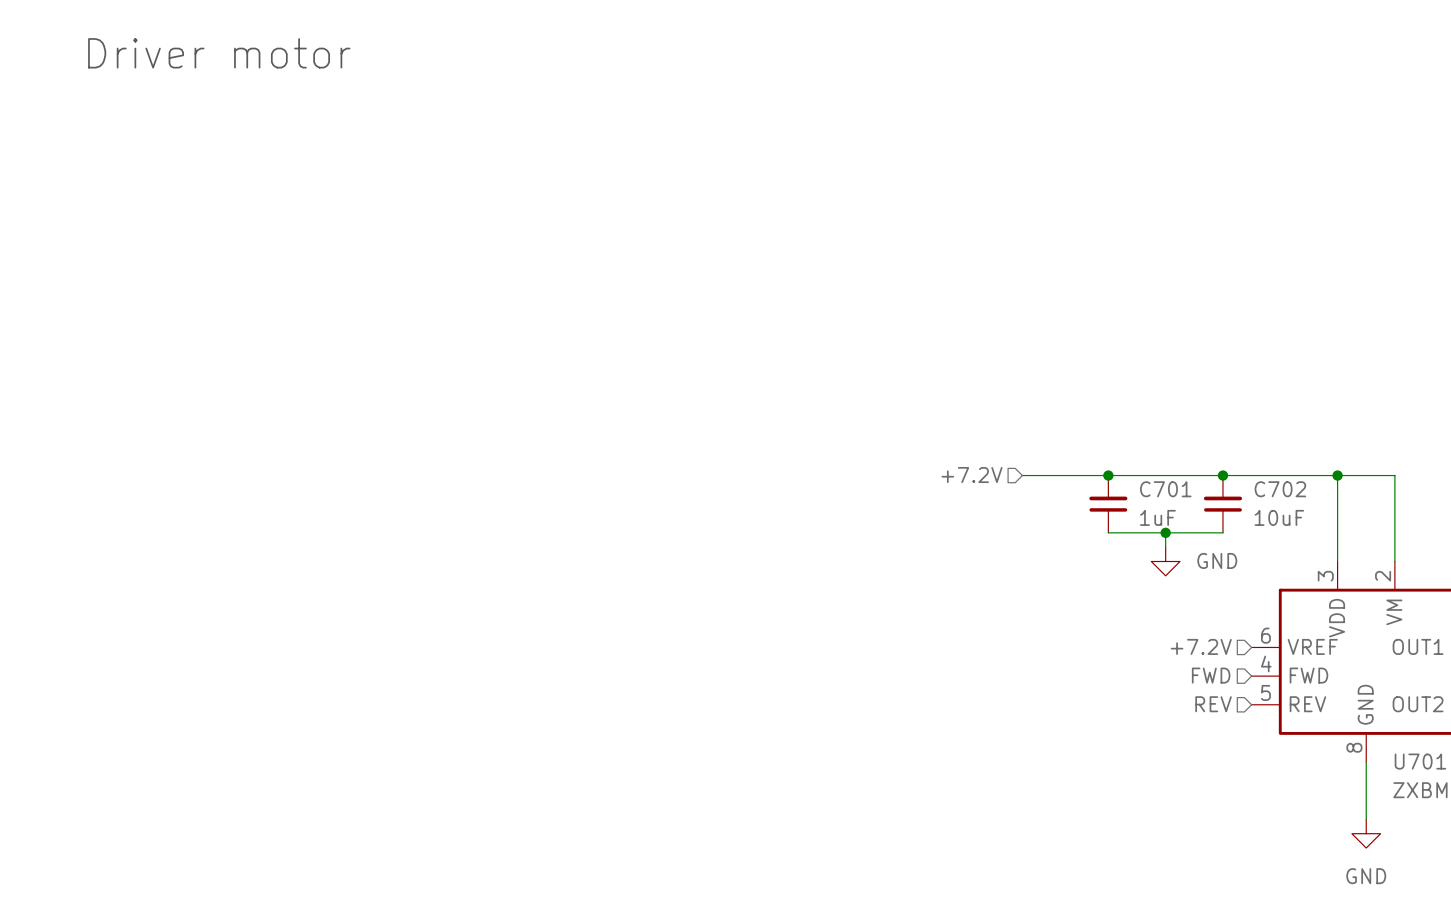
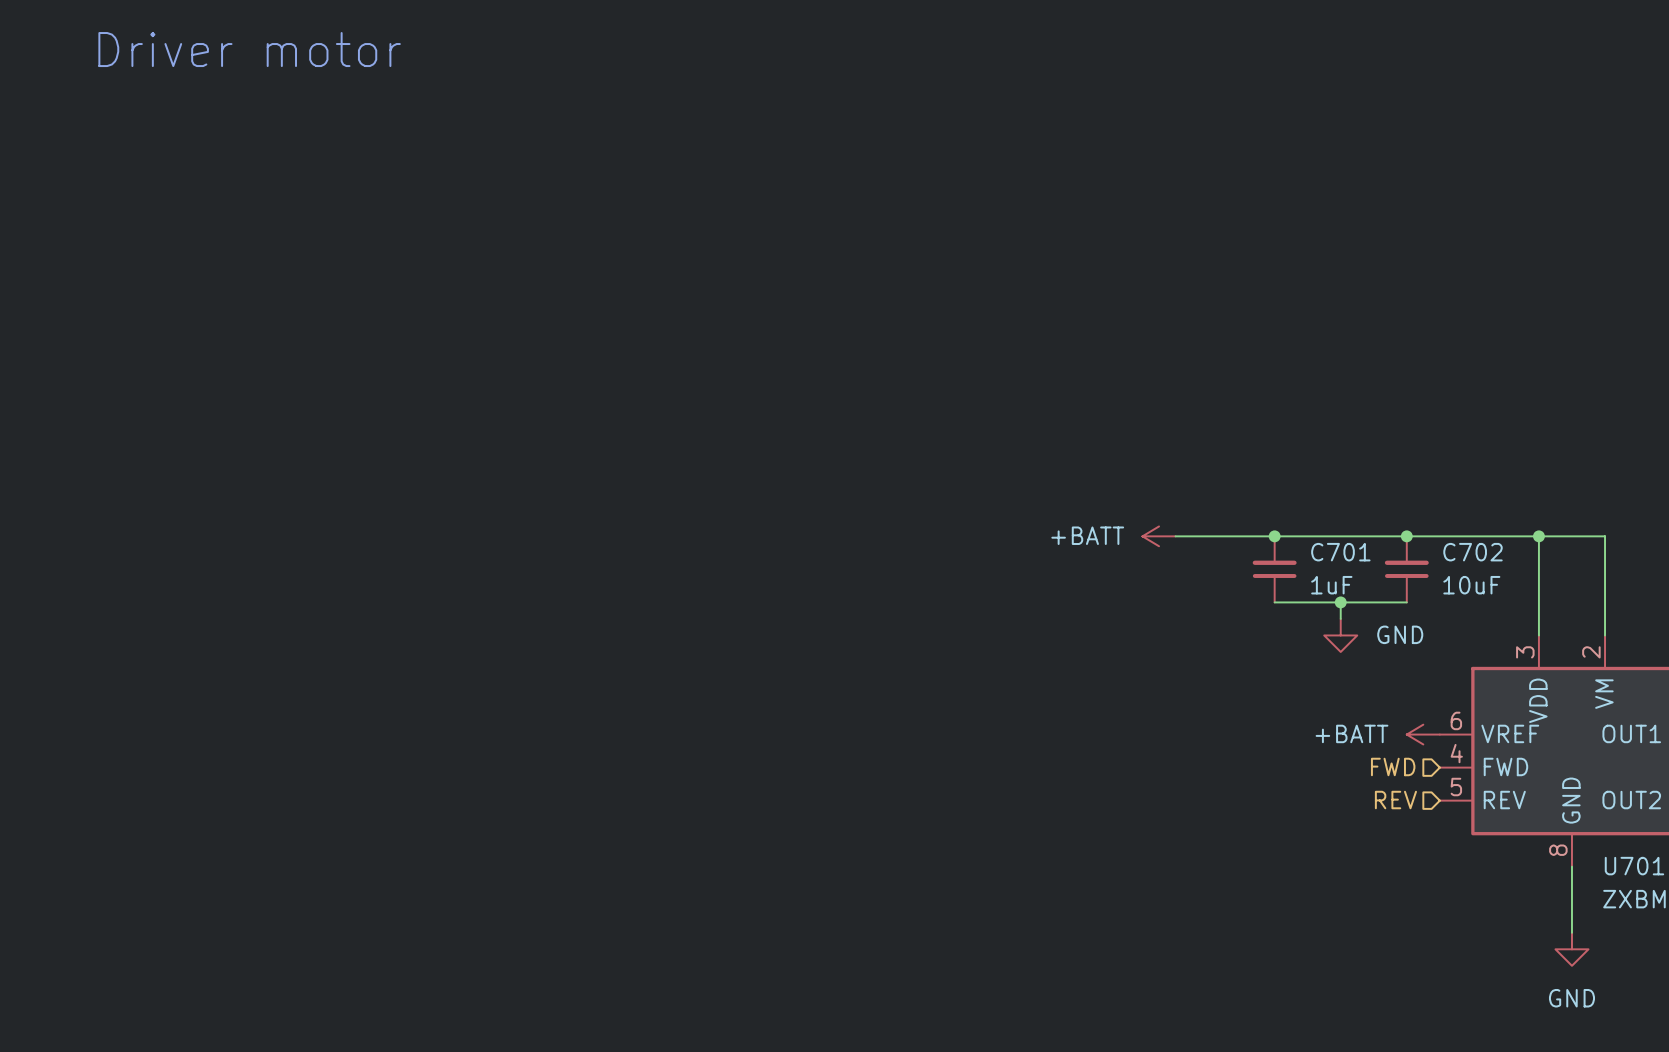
hierarchical label: +7.2V (972, 475) -> none
power symbol: none -> +BATT (1159, 536)
hierarchical label: +7.2V (1201, 646) -> none
power symbol: none -> +BATT (1423, 734)

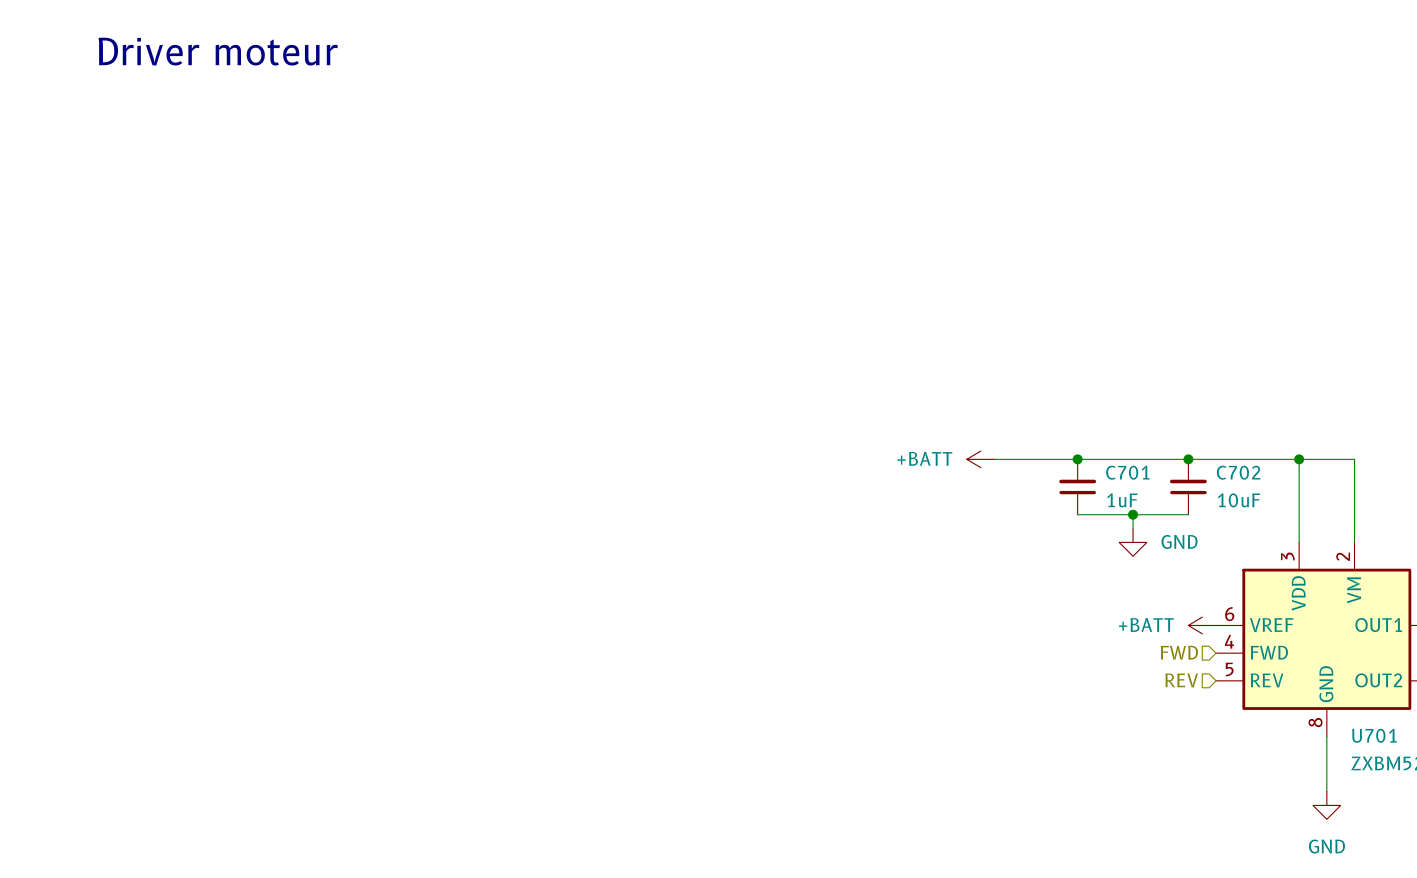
text: Driver motor (249, 49) -> Driver moteur (218, 51)

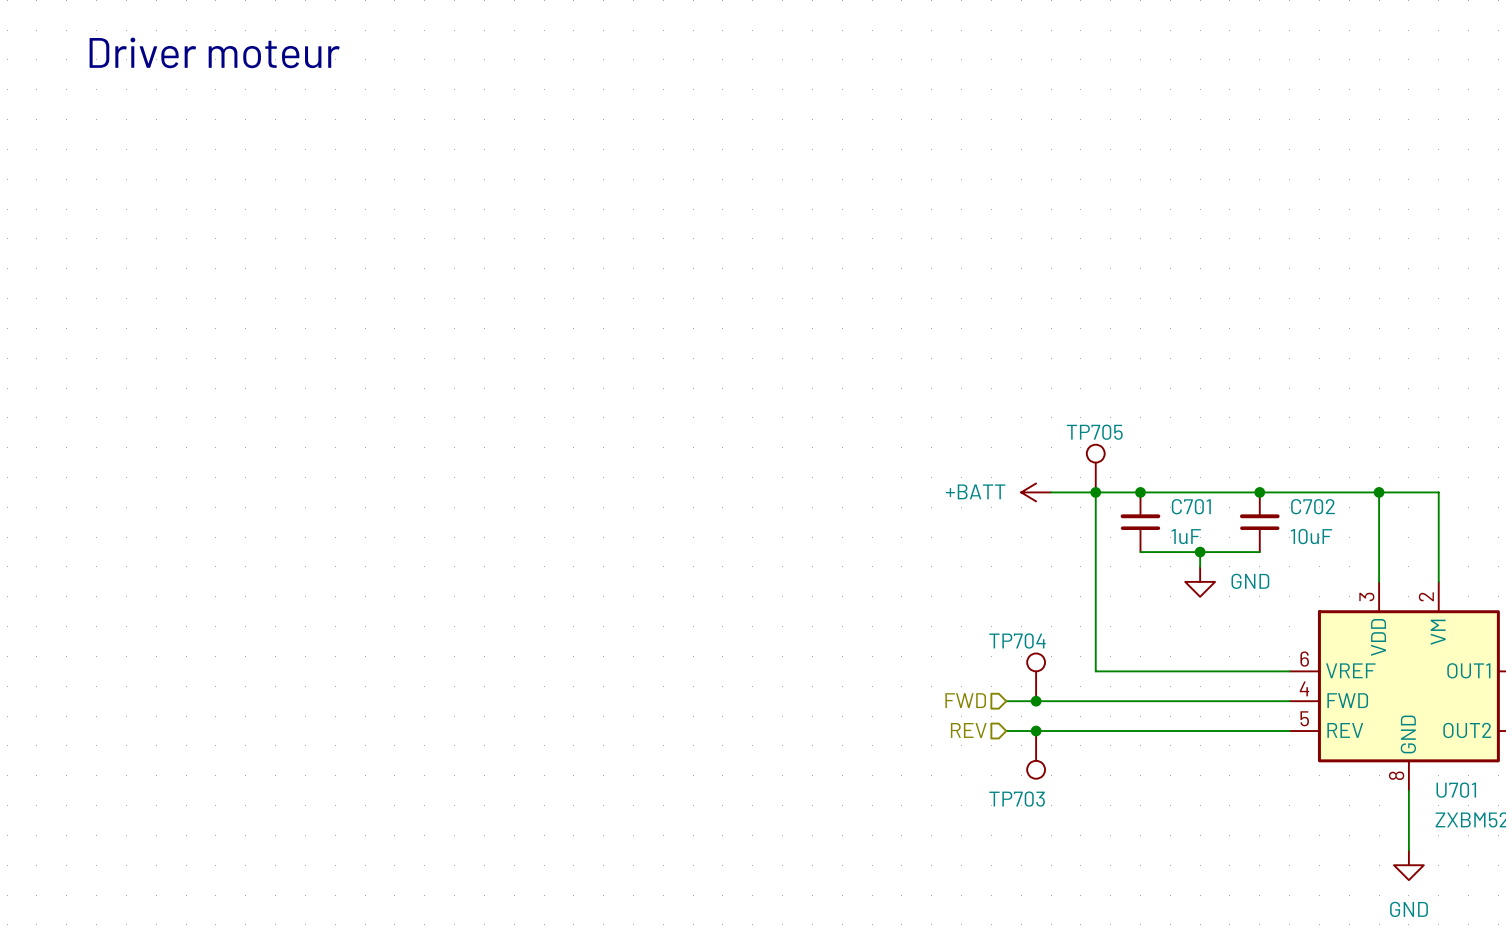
TP705: none -> (1095, 468)
wire: none -> (1095, 492) (1095, 671) (1289, 671)
junction: none -> (1095, 492)
power symbol: +BATT (1202, 625) -> none
TP704: none -> (1036, 677)
hierarchical label position: FWD (1179, 652) -> FWD (965, 700)
wire: none -> (1006, 701) (1289, 701)
junction: none -> (1036, 701)
wire: none -> (1006, 731) (1289, 731)
junction: none -> (1036, 731)
hierarchical label position: REV (1181, 680) -> REV (968, 730)
TP703: none -> (1036, 754)

